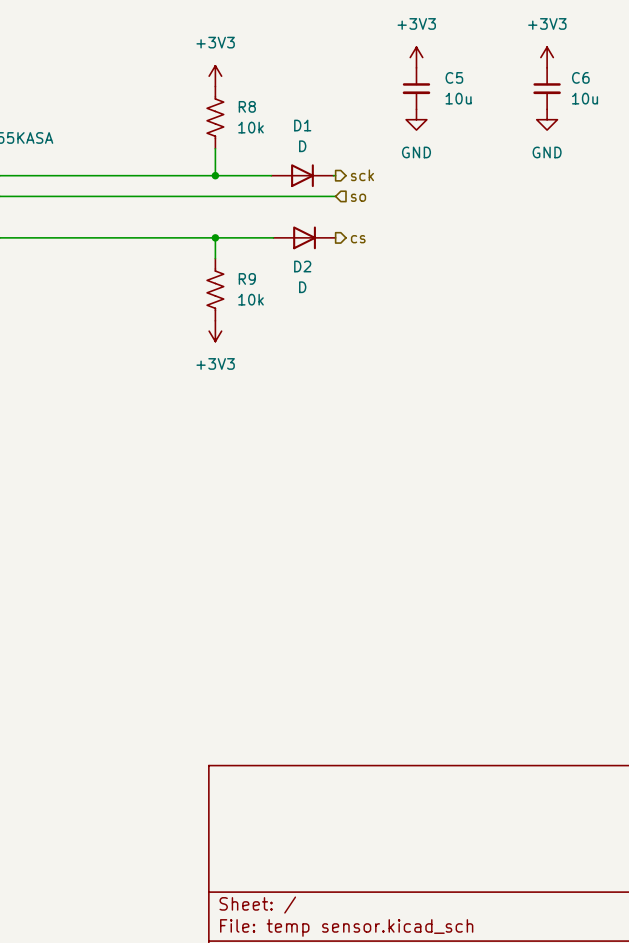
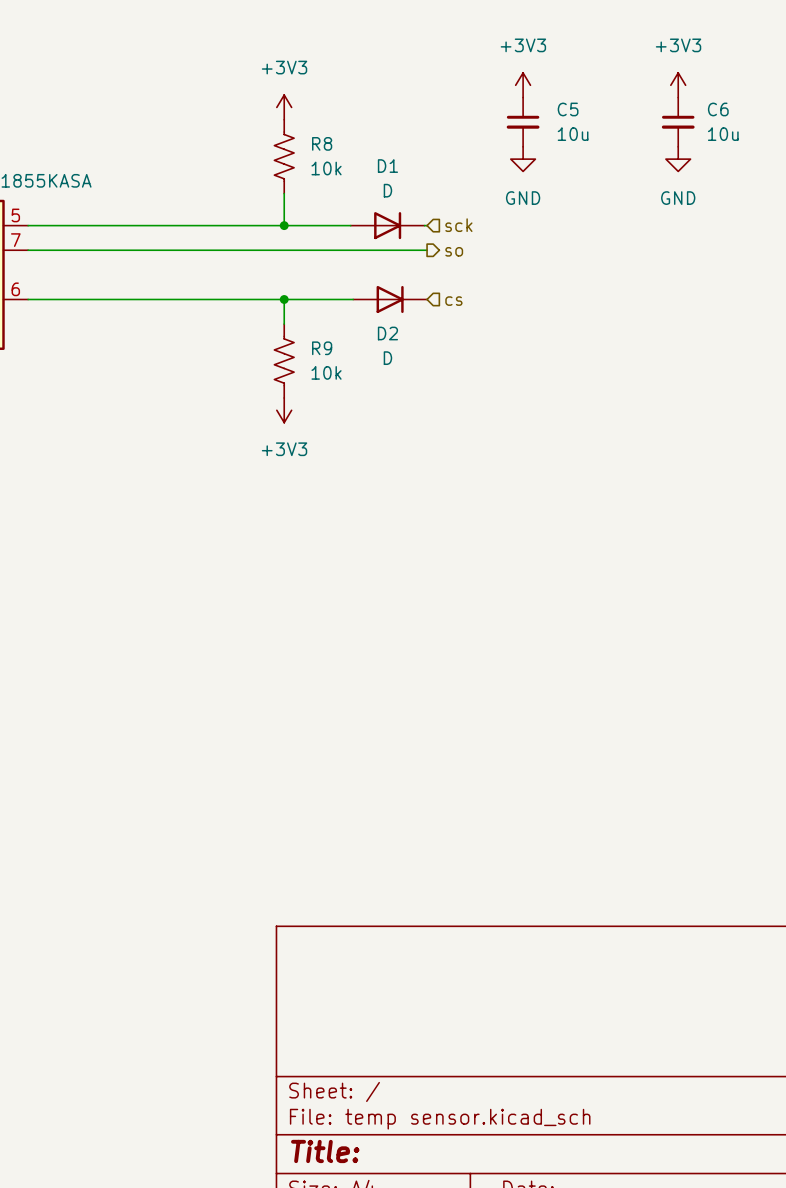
hierarchical label shape: output (362, 175) -> input (458, 225)
hierarchical label shape: input (358, 197) -> output (454, 251)
hierarchical label shape: output (358, 239) -> input (453, 301)

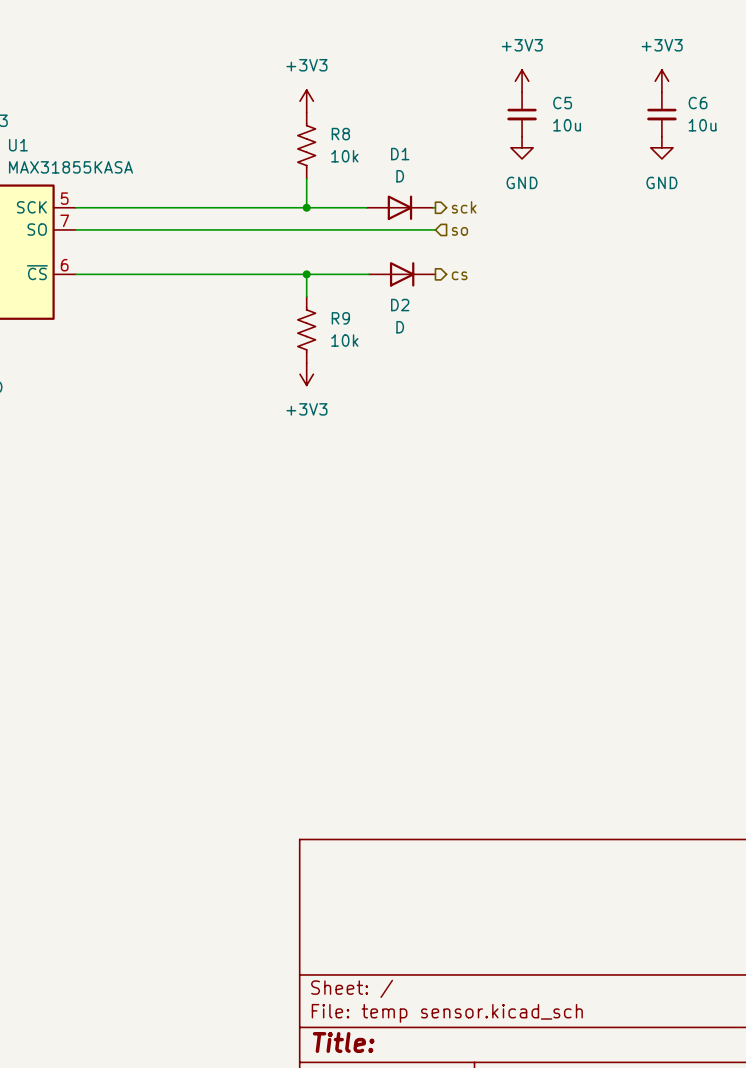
hierarchical label shape: input (458, 225) -> output (464, 207)
hierarchical label shape: output (454, 251) -> input (459, 231)
hierarchical label shape: input (453, 301) -> output (459, 275)

